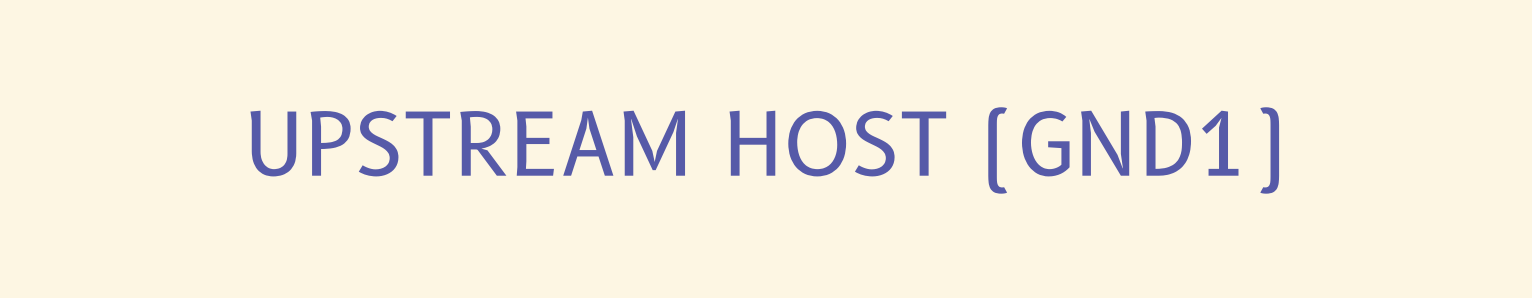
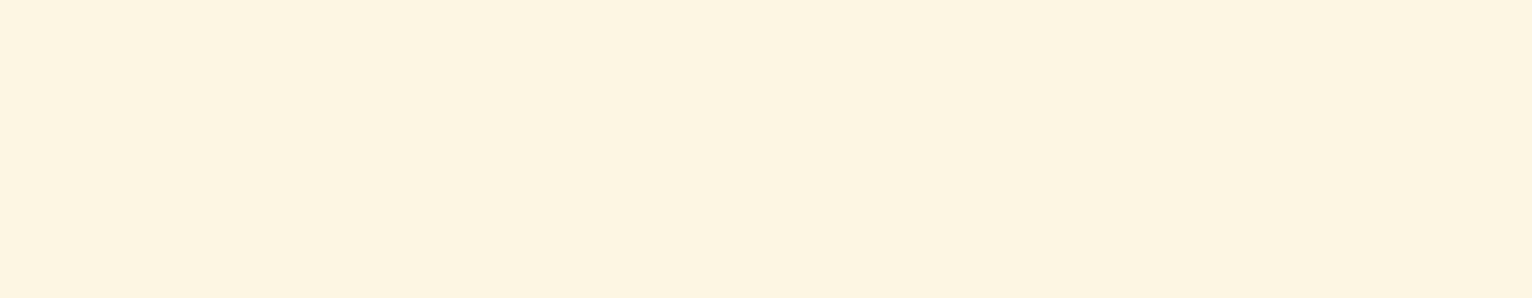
text: UPSTREAM HOST (GND1) (764, 150) -> none

